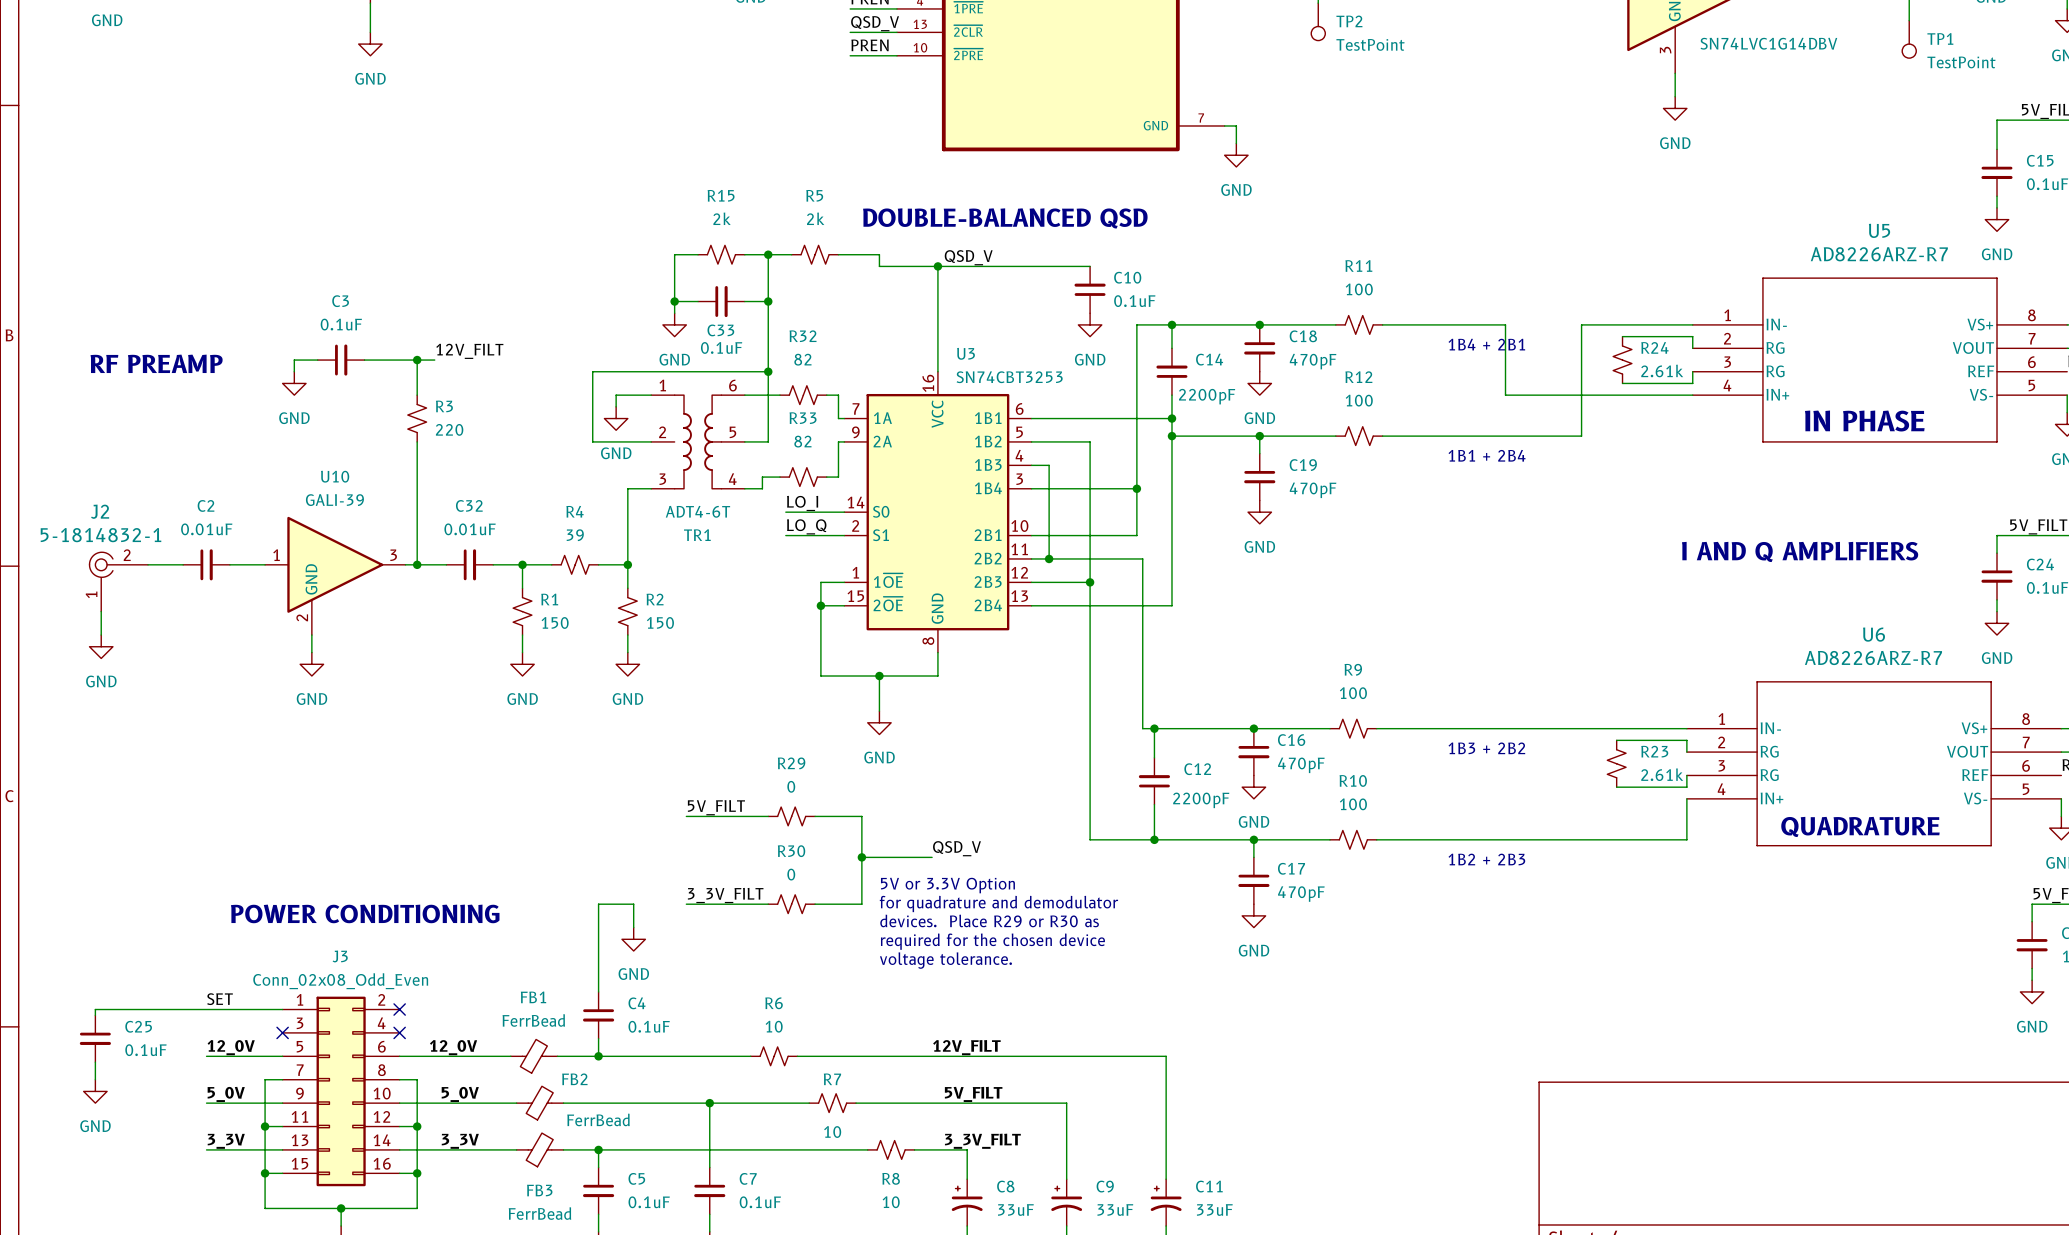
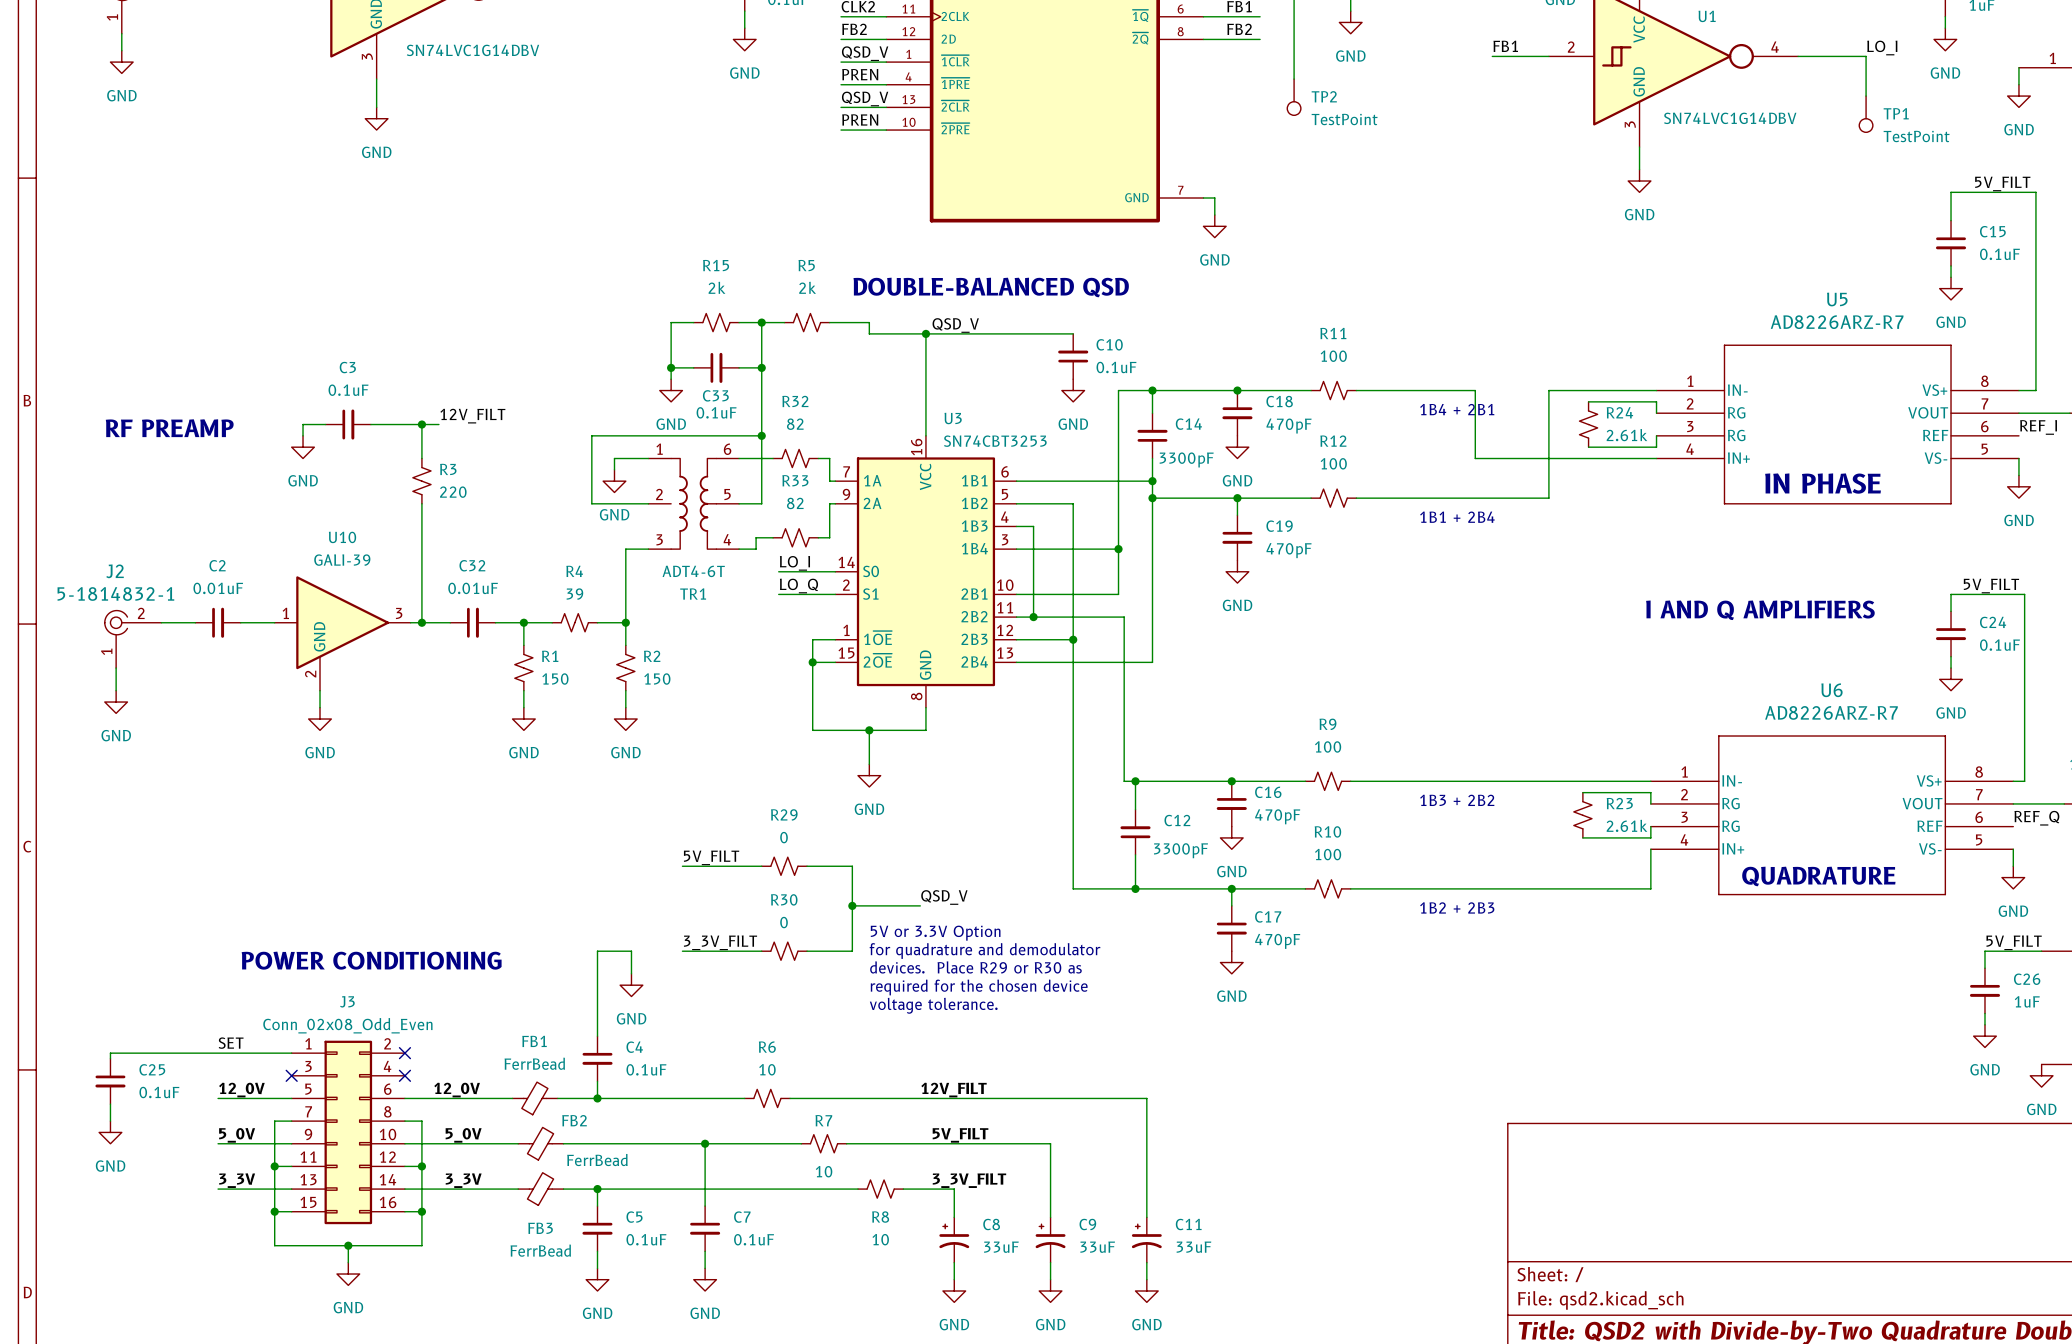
C14 value: 2200pF (1207, 396) -> 3300pF (1186, 459)
C12 value: 2200pF (1201, 800) -> 3300pF (1180, 850)

